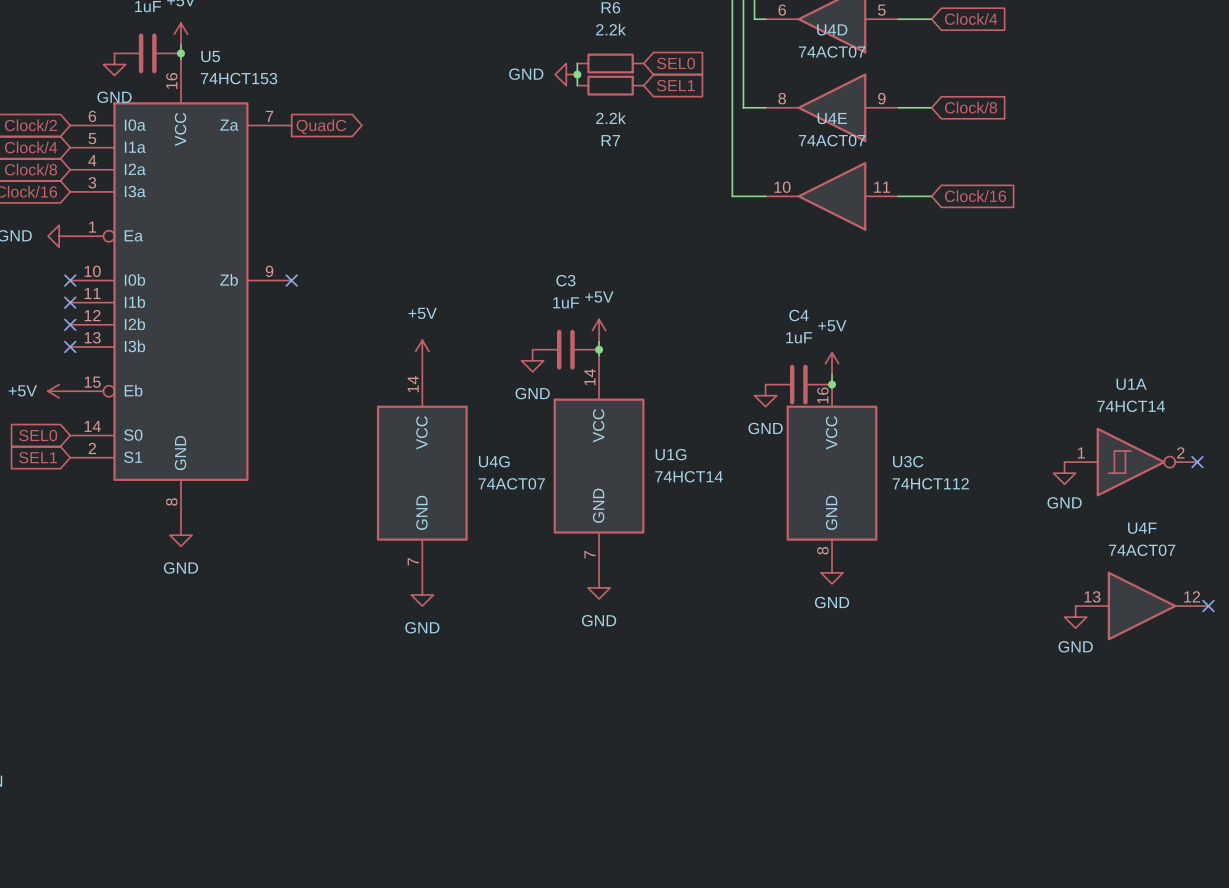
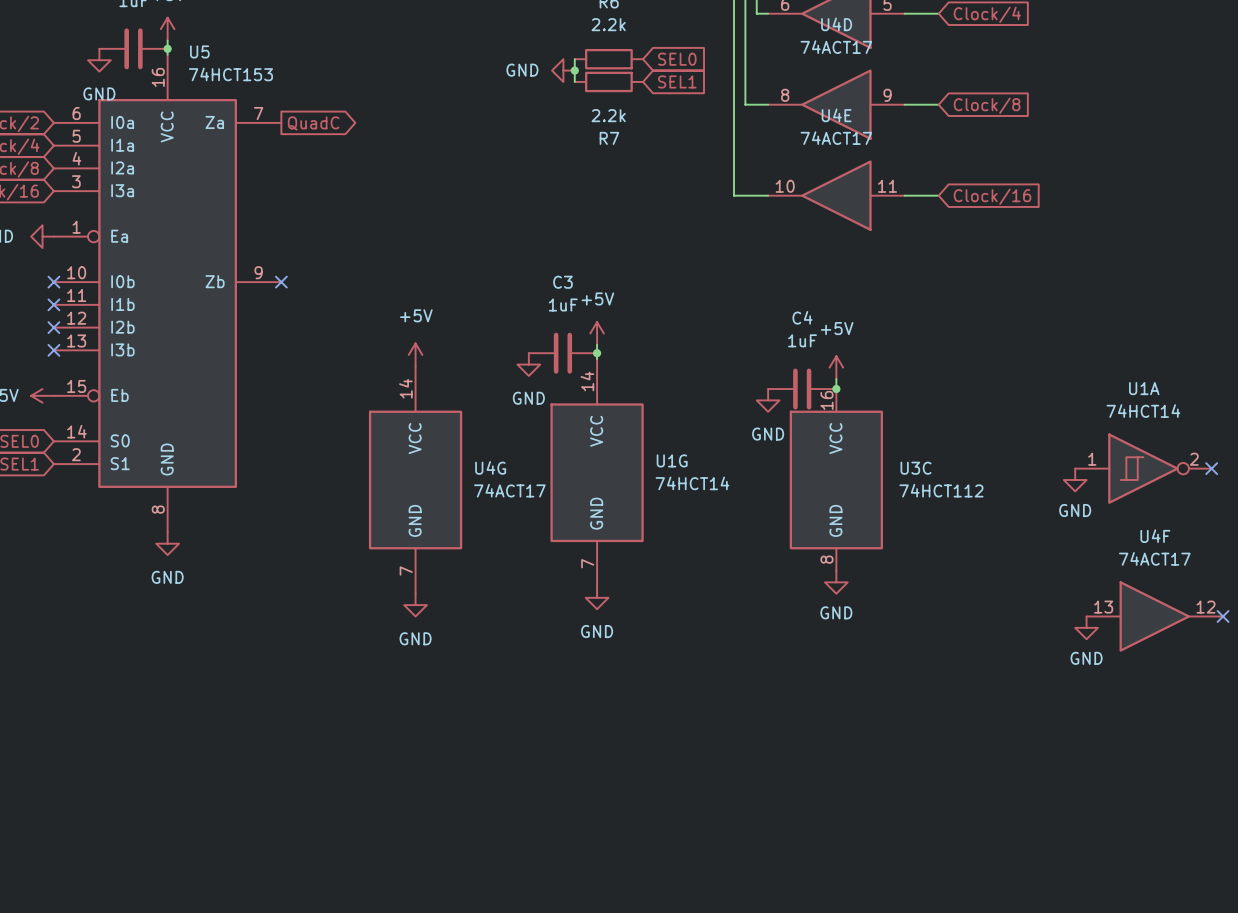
U4D value: 74ACT07 (832, 52) -> 74ACT17 (836, 47)
U4E value: 74ACT07 (832, 140) -> 74ACT17 (836, 138)
U4G value: 74ACT07 (511, 483) -> 74ACT17 (509, 490)
U4F value: 74ACT07 (1142, 550) -> 74ACT17 (1154, 558)

